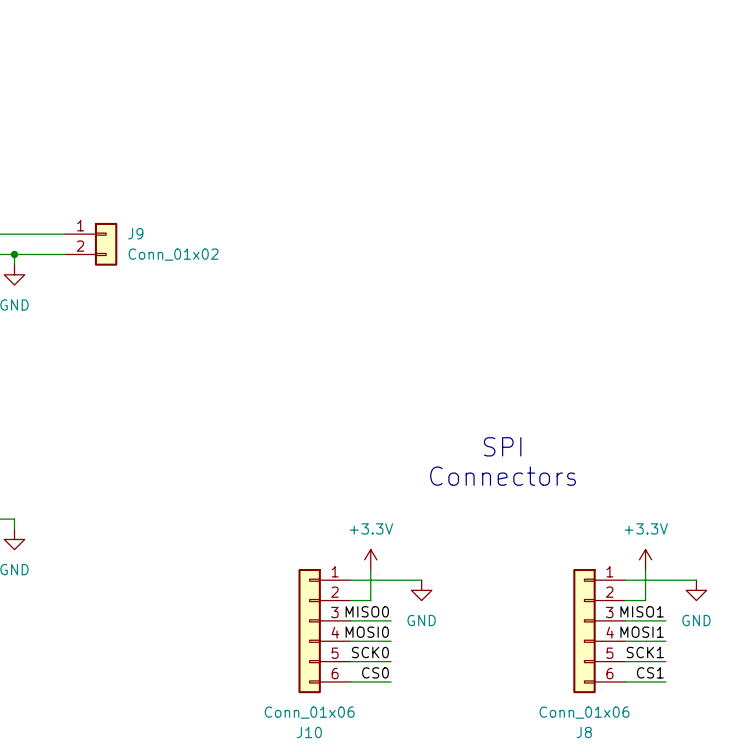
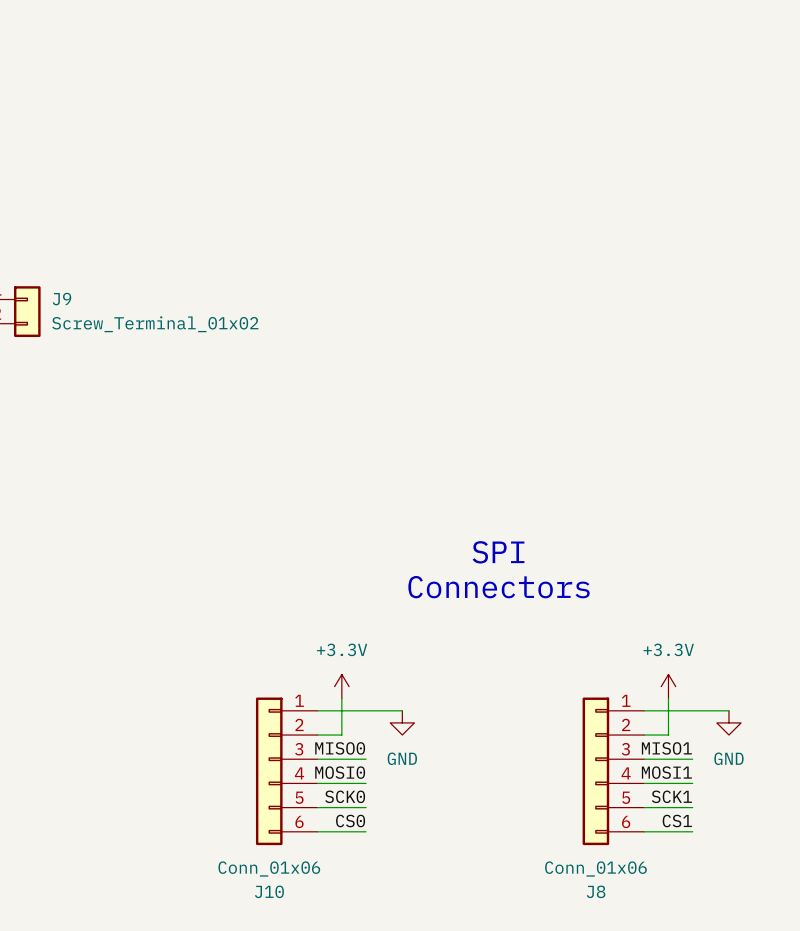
J9 value: Conn_01x02 (173, 254) -> Screw_Terminal_01x02 (155, 324)

